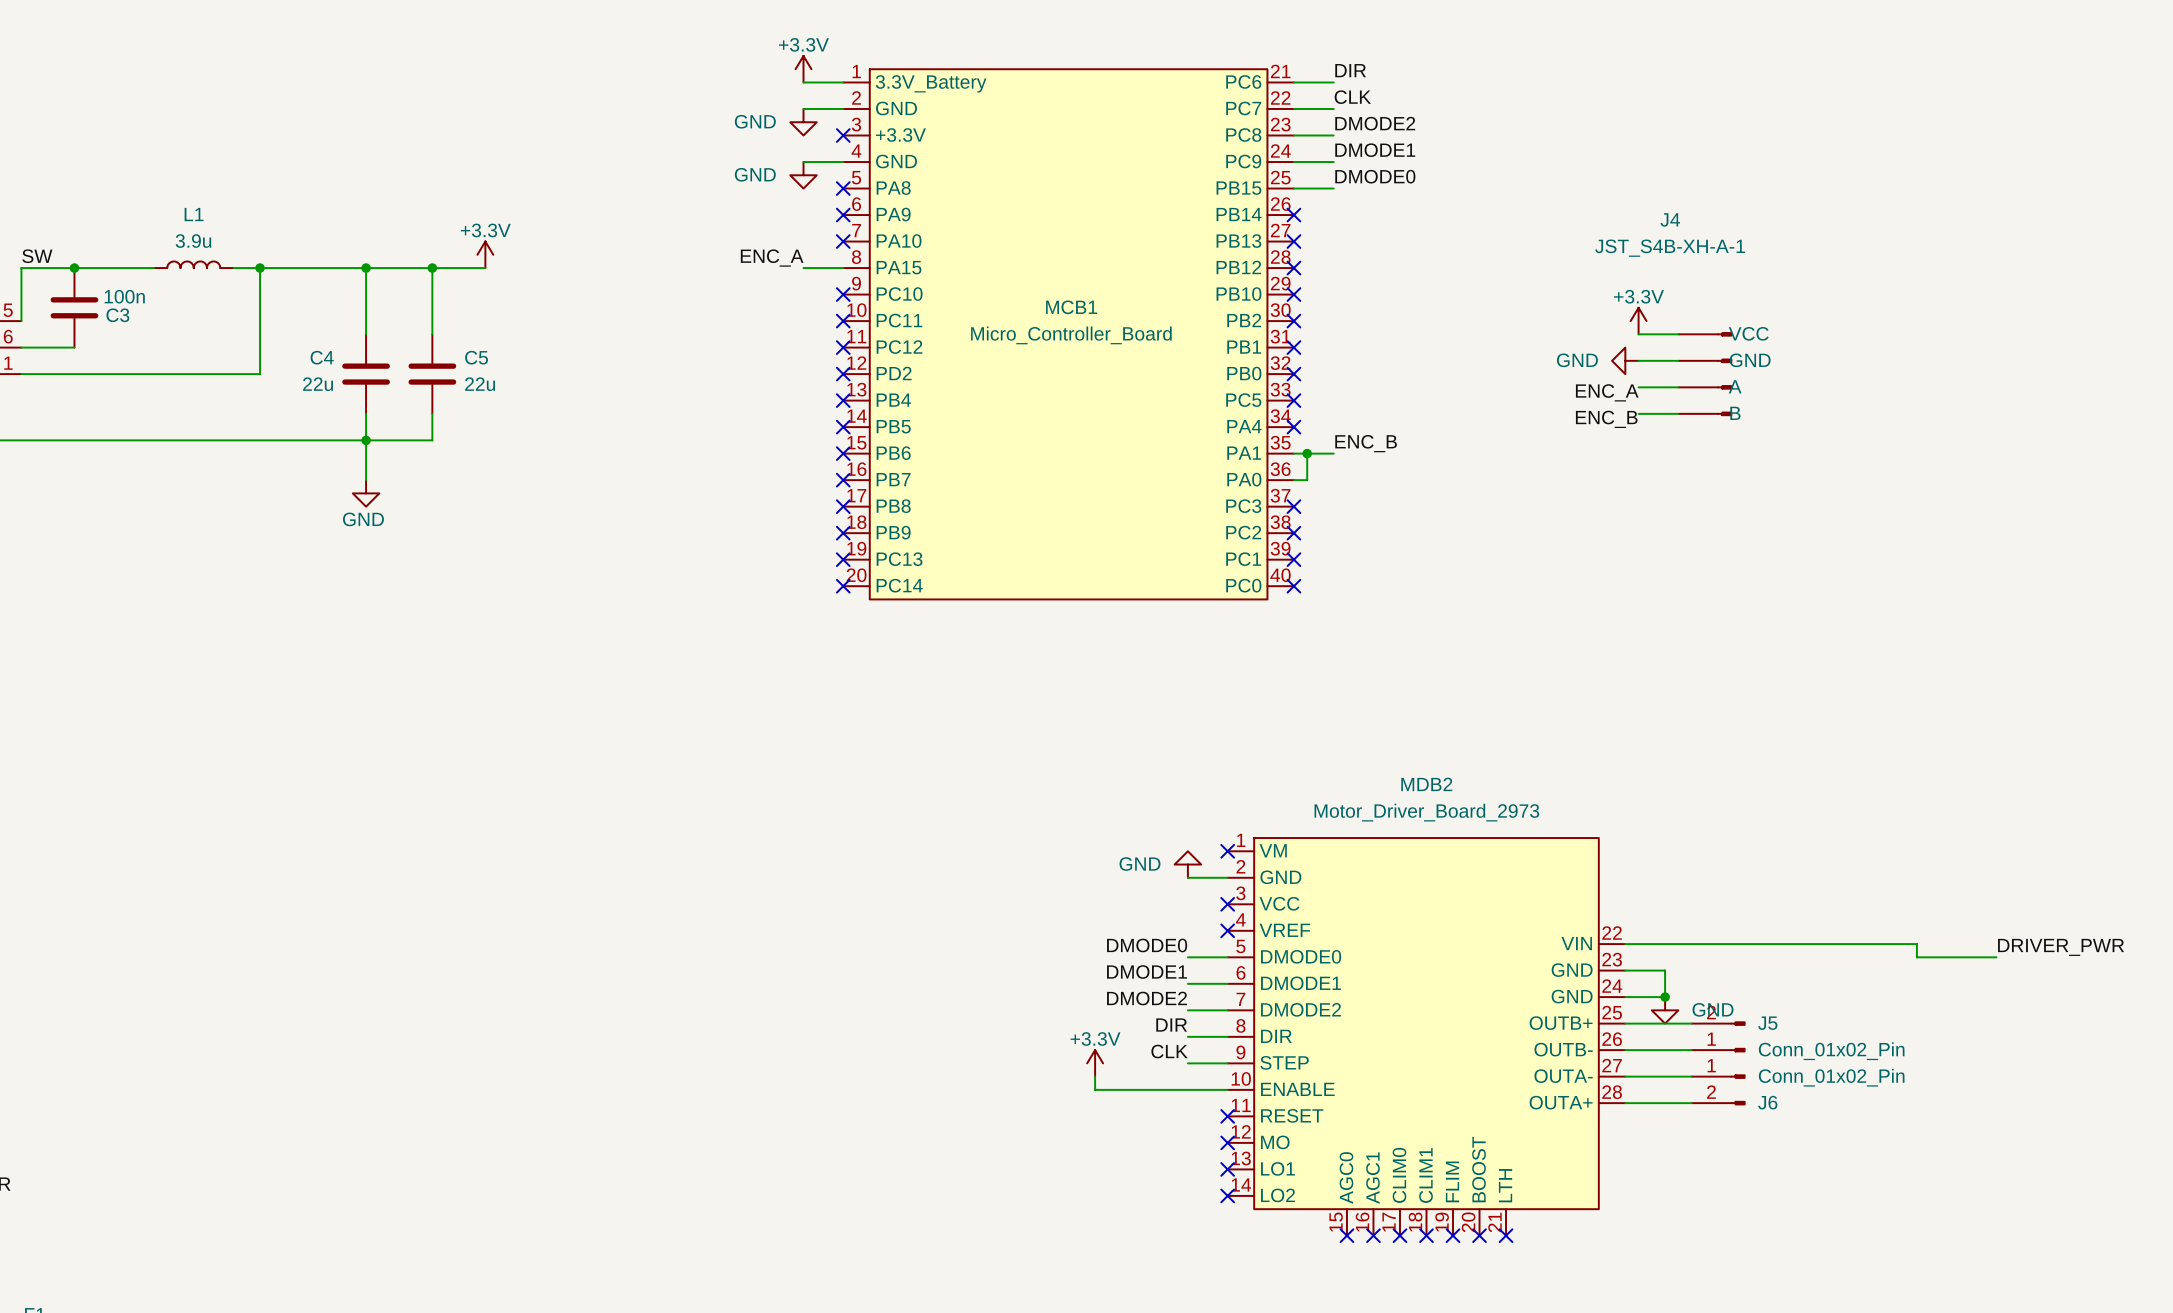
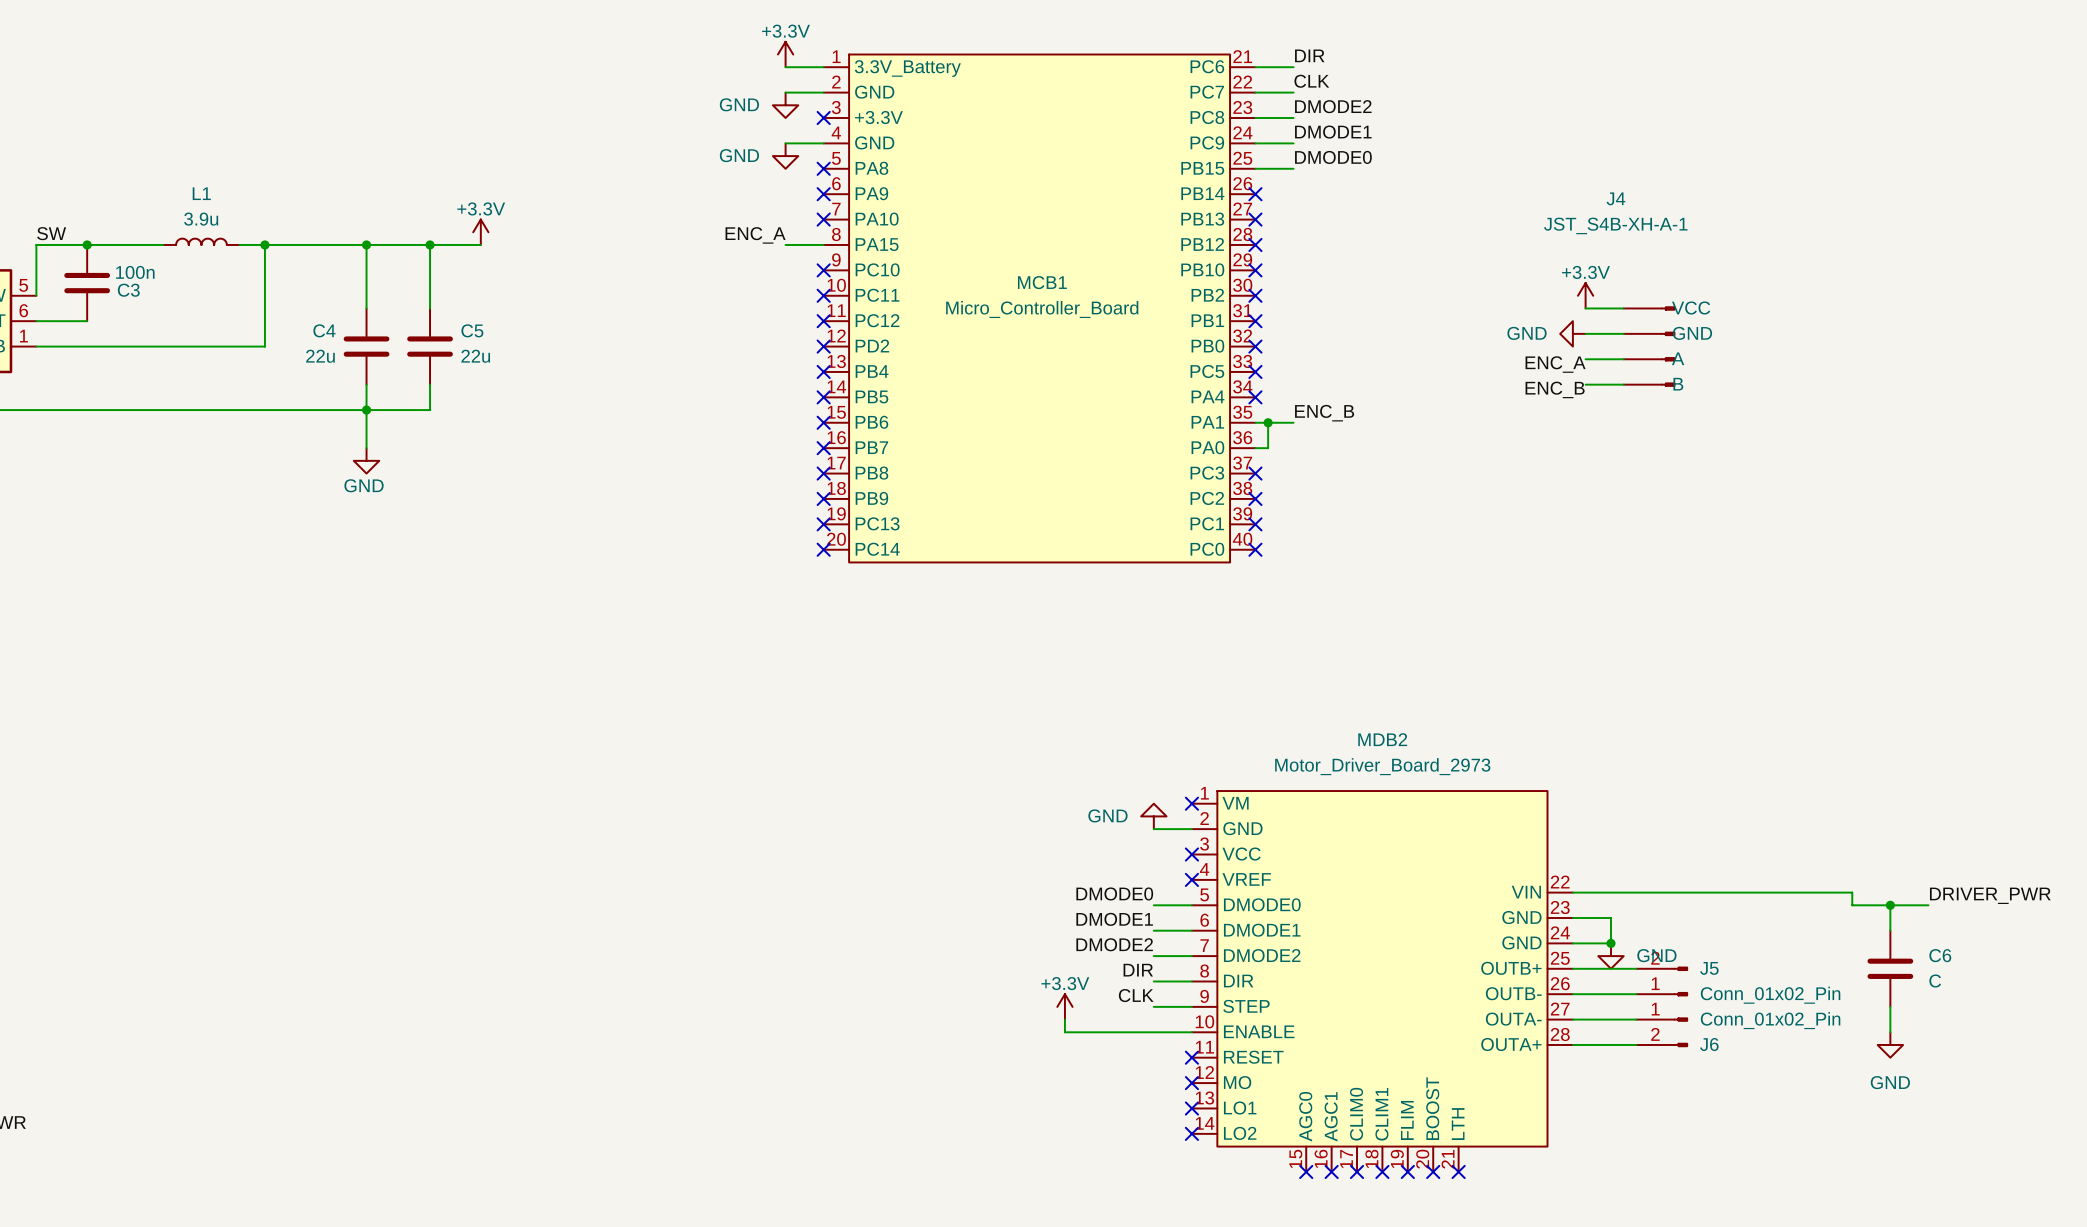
wire: none -> (1890, 905) (1890, 930)
junction: none -> (1890, 905)
C6: none -> C (1890, 968)
wire: none -> (1890, 1006) (1890, 1032)
power symbol: none -> GND (1890, 1044)

